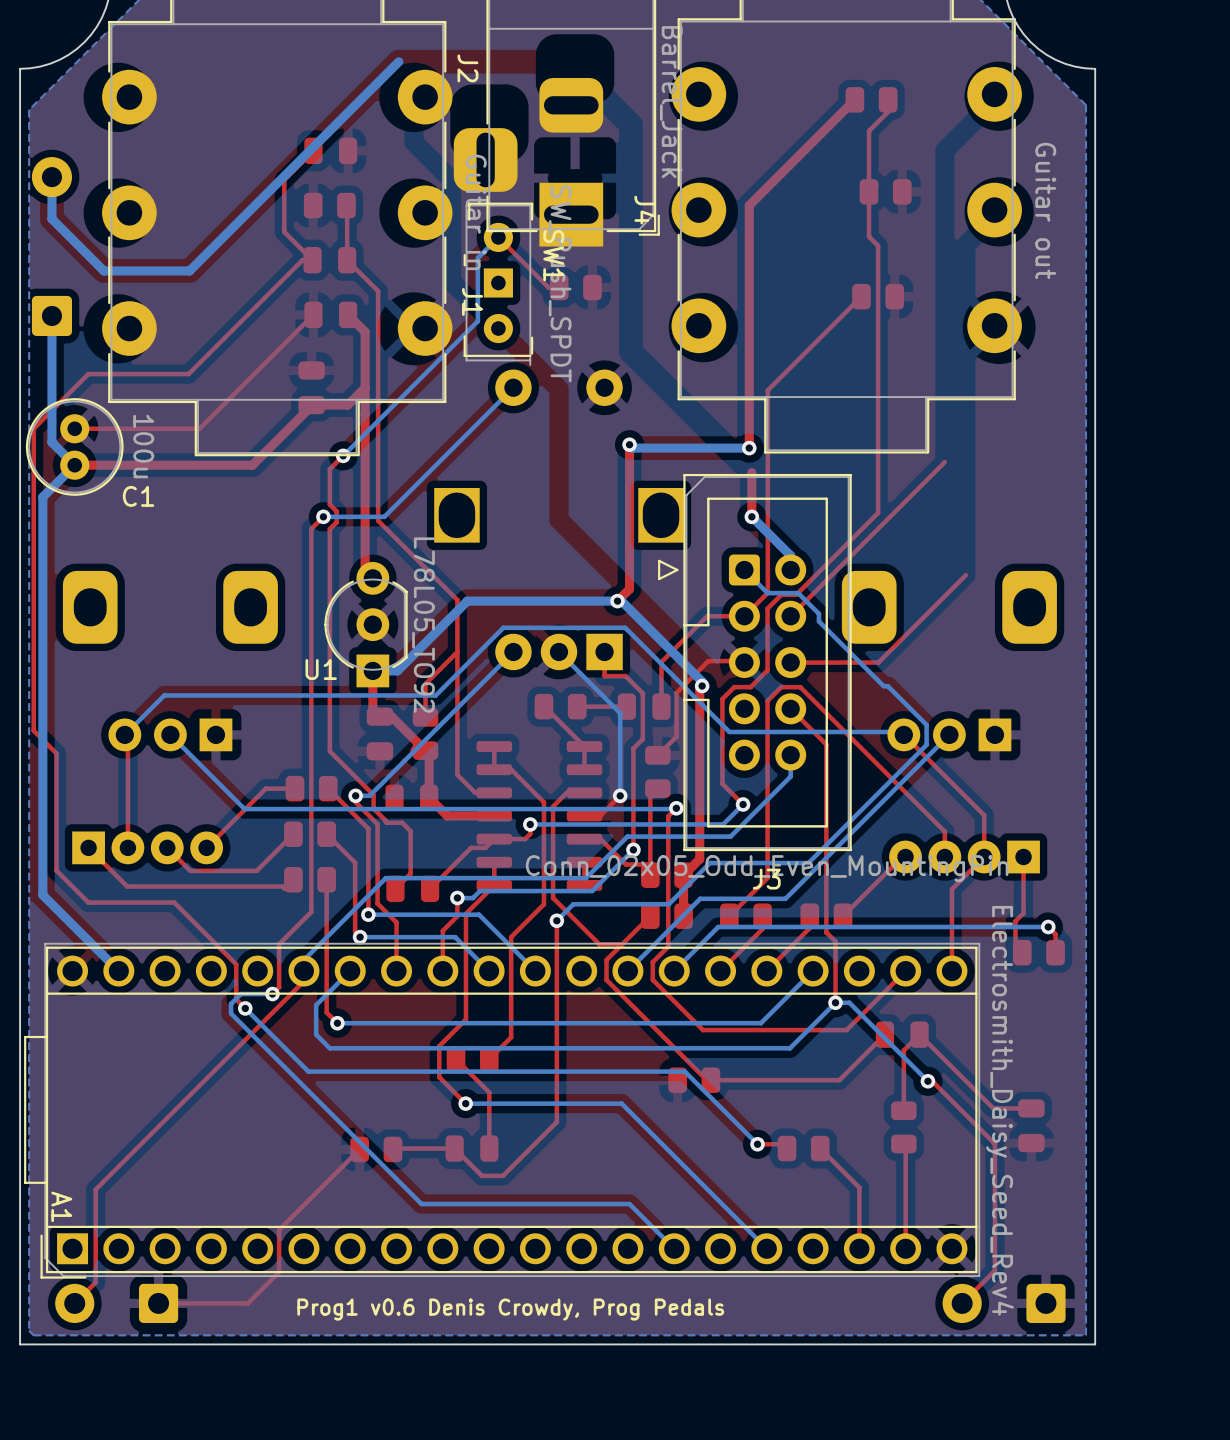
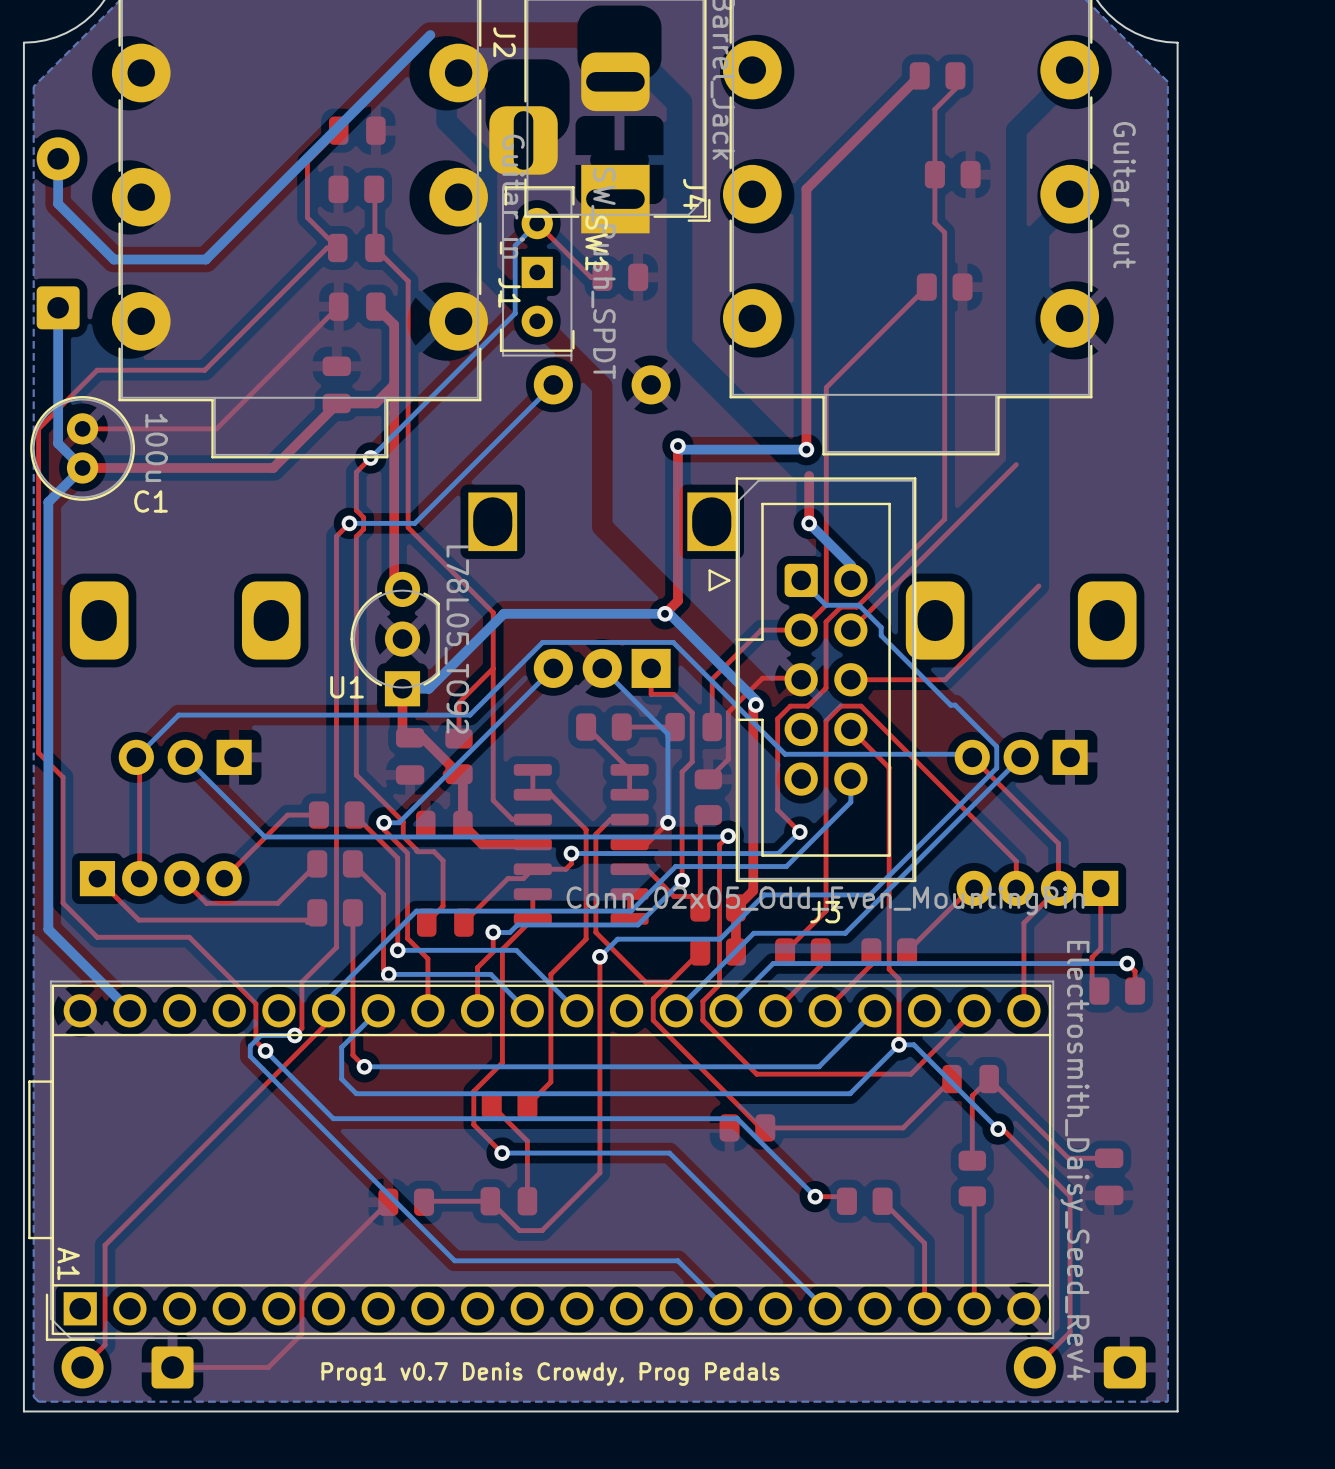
text: Prog1 v0.6 Denis Crowdy, Prog Pedals (510, 1309) -> Prog1 v0.7 Denis Crowdy, Prog Pedals (550, 1374)

